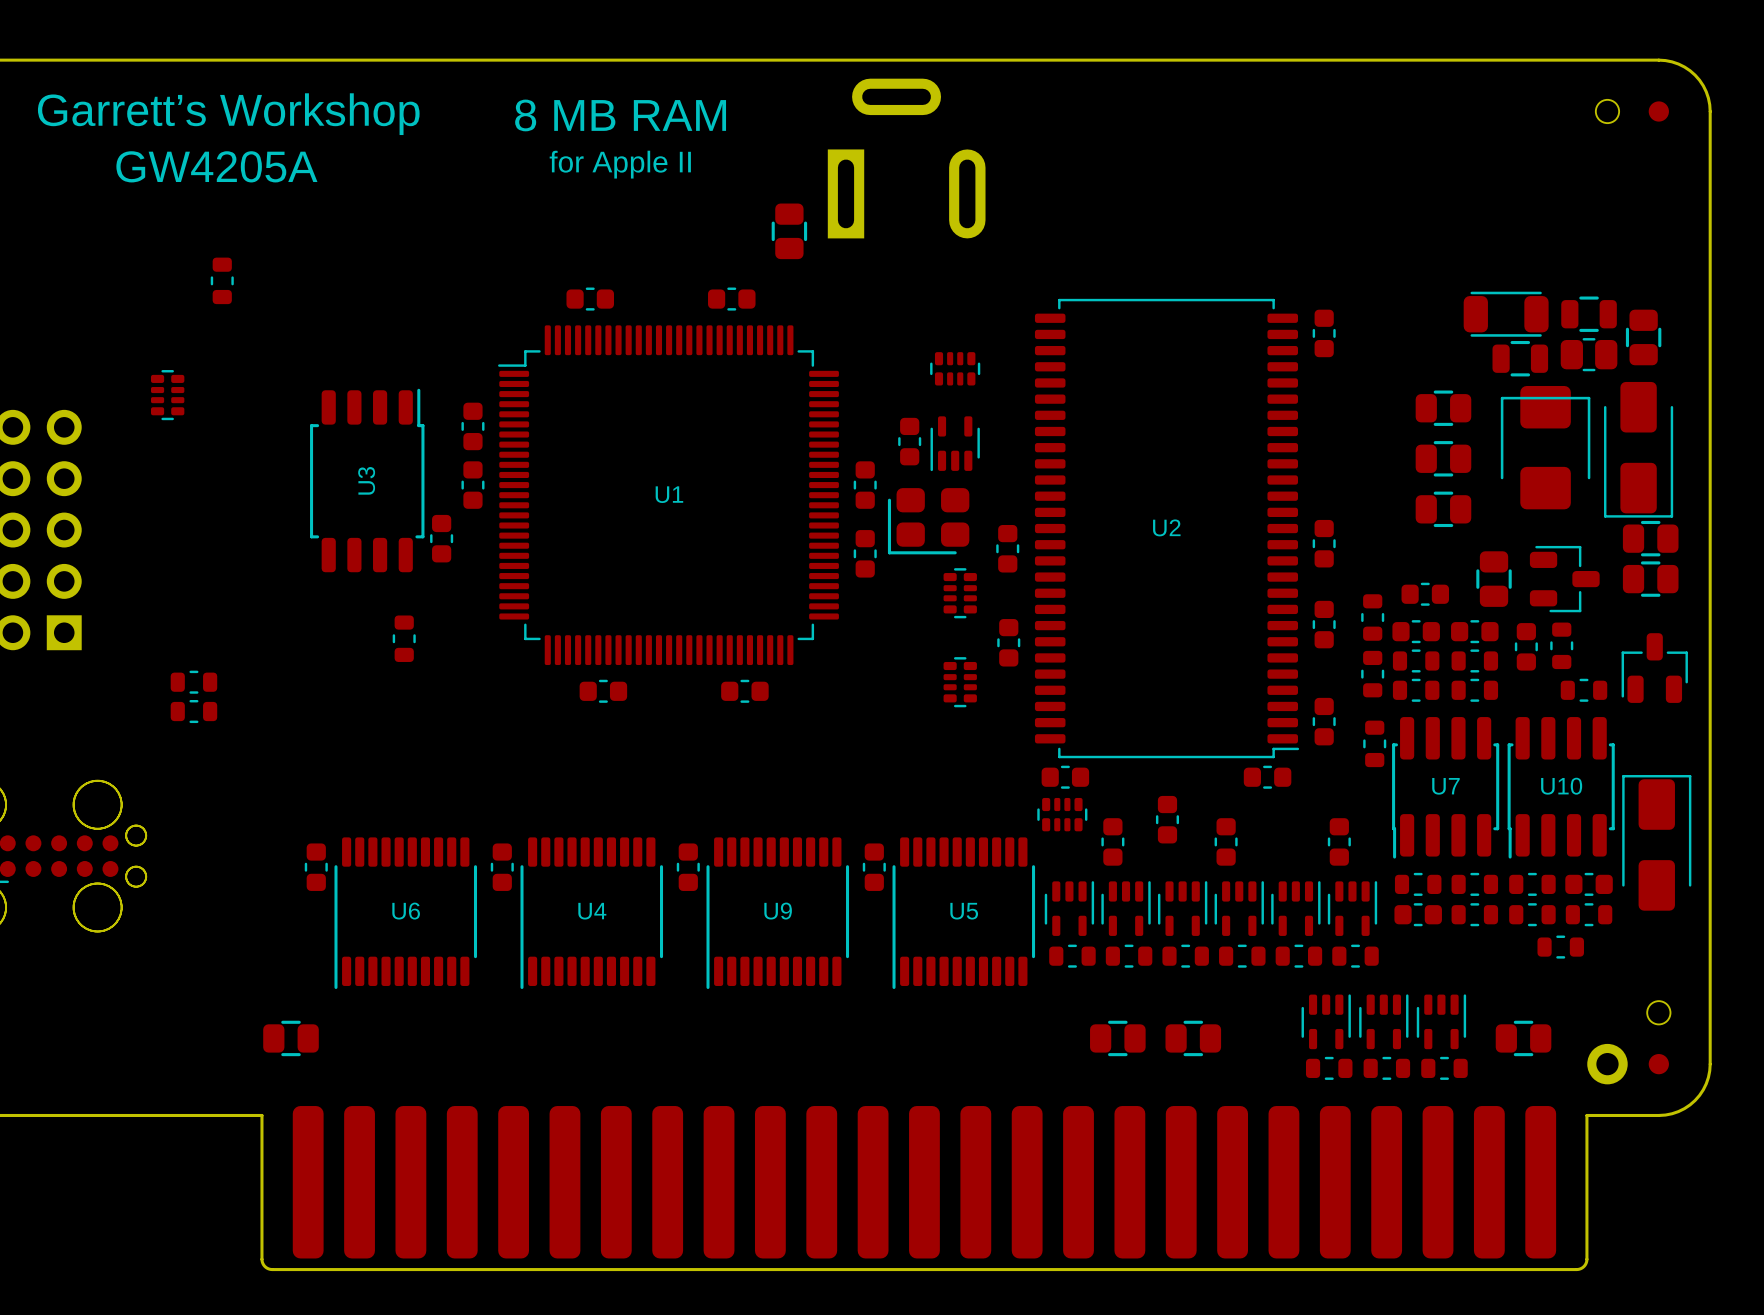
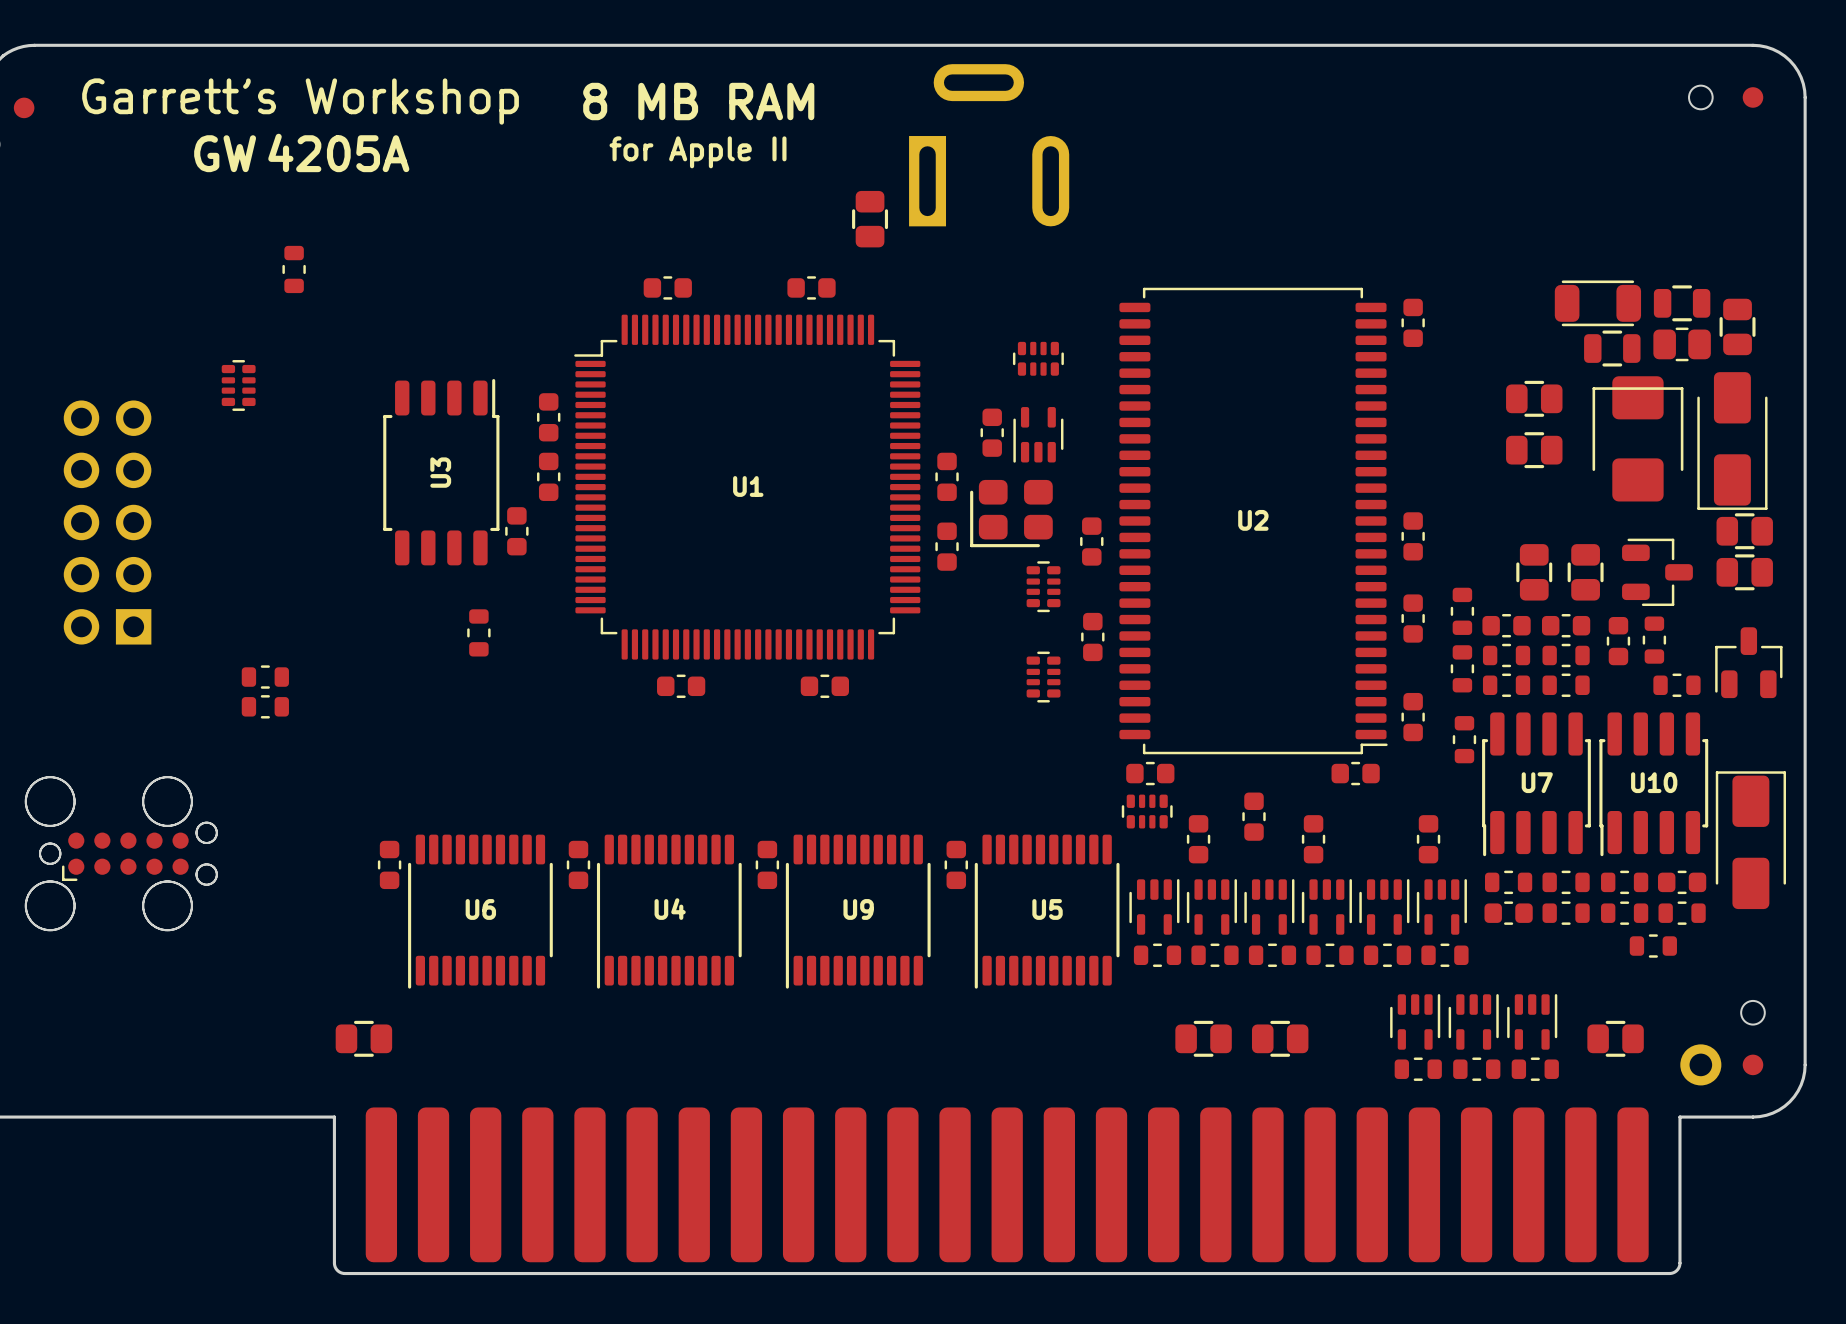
part rotation: 0° (1443, 509) -> 90° clockwise (1534, 572)
part position: (1443, 509) -> (1534, 572)
part: (1425, 594) -> none

